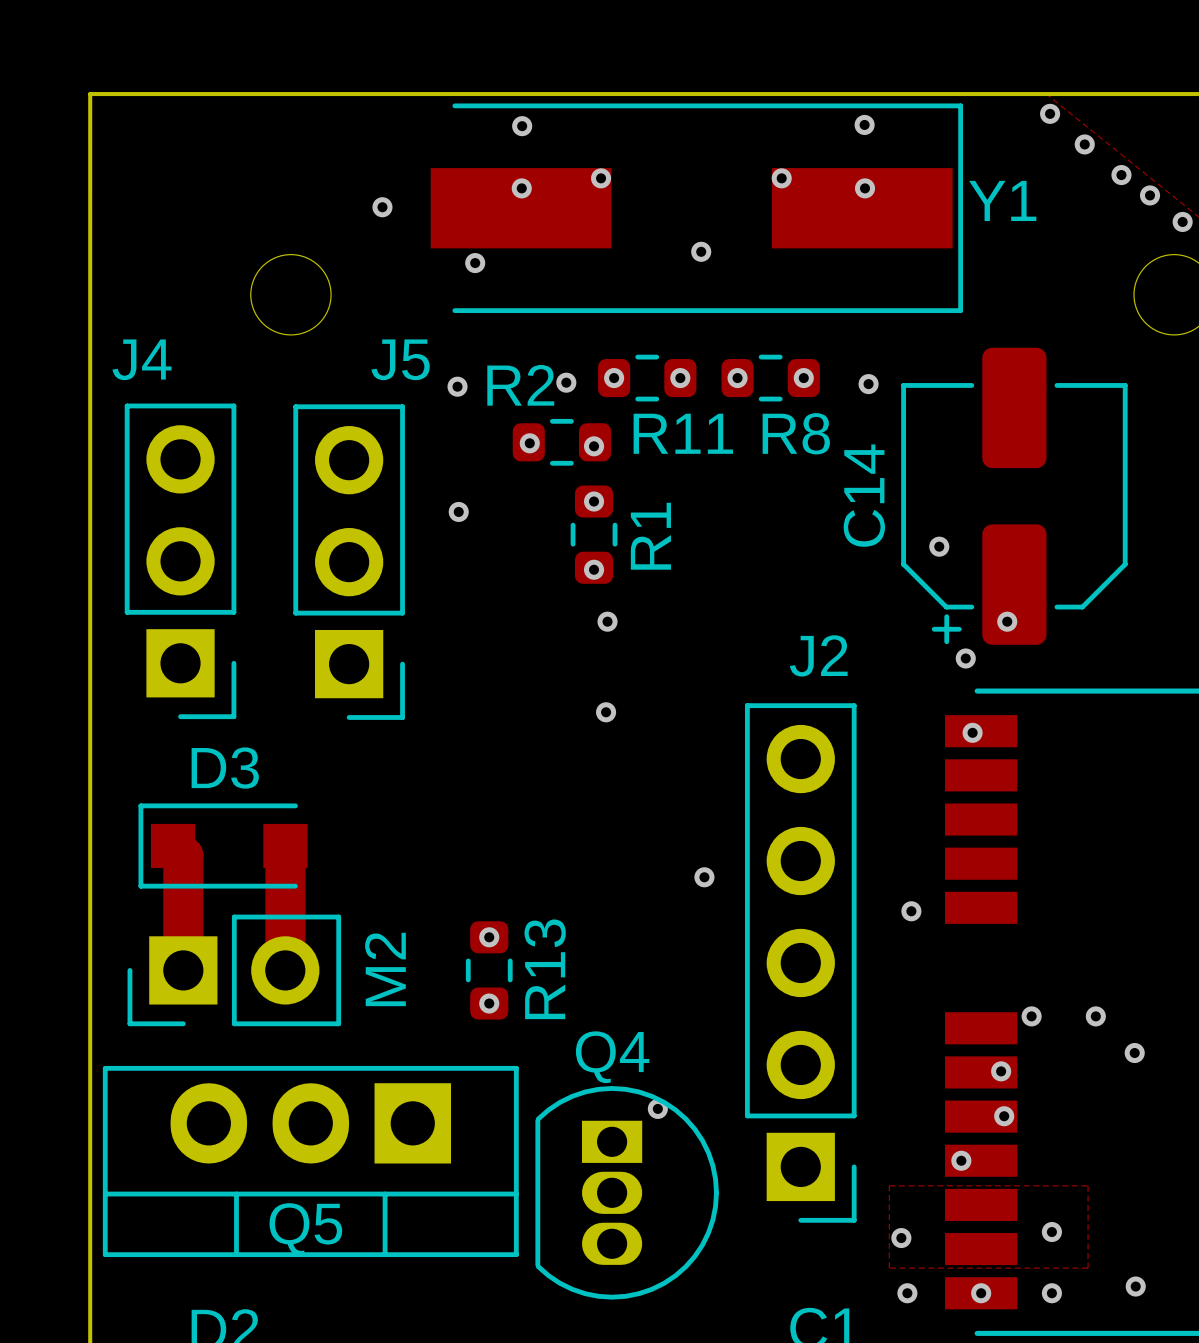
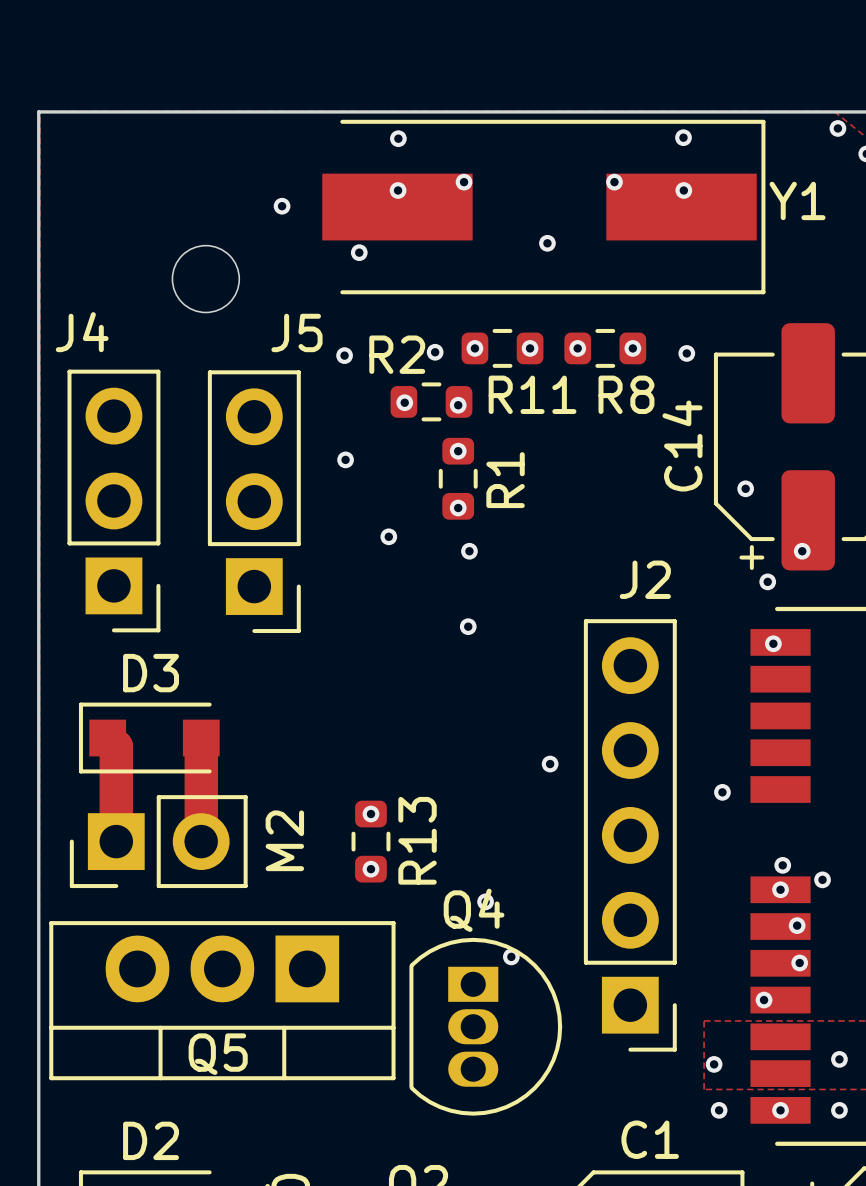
via: none -> (388, 536)
via: none -> (782, 865)
via: none -> (485, 901)
via position: (1004, 1116) -> (780, 889)

